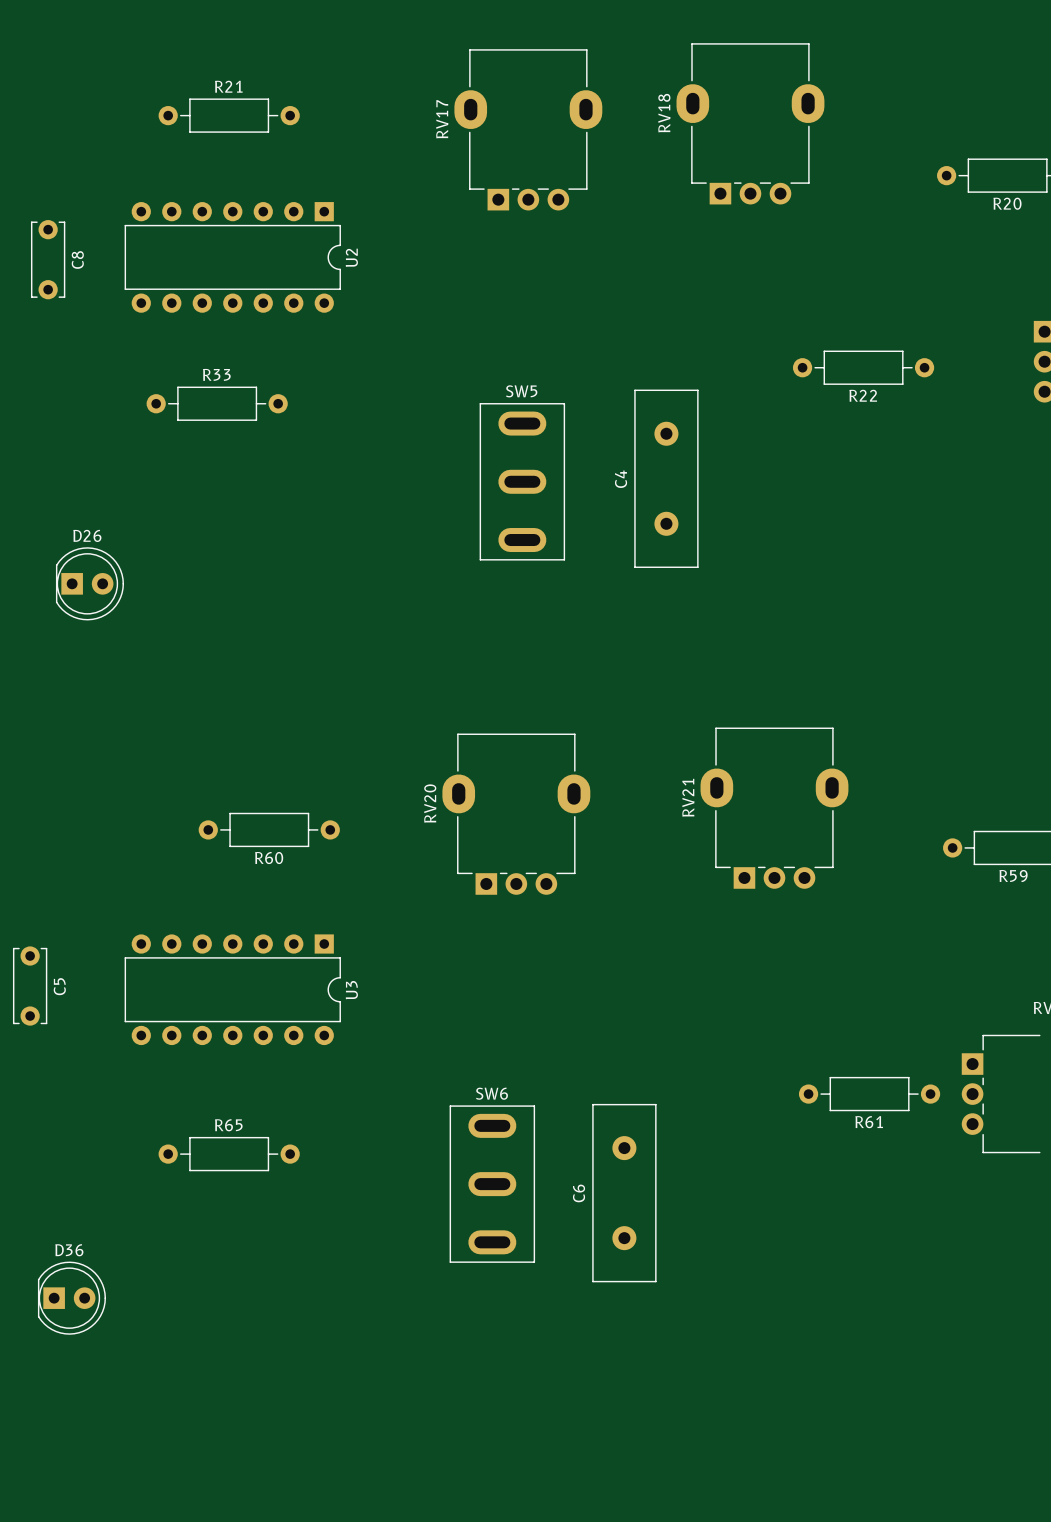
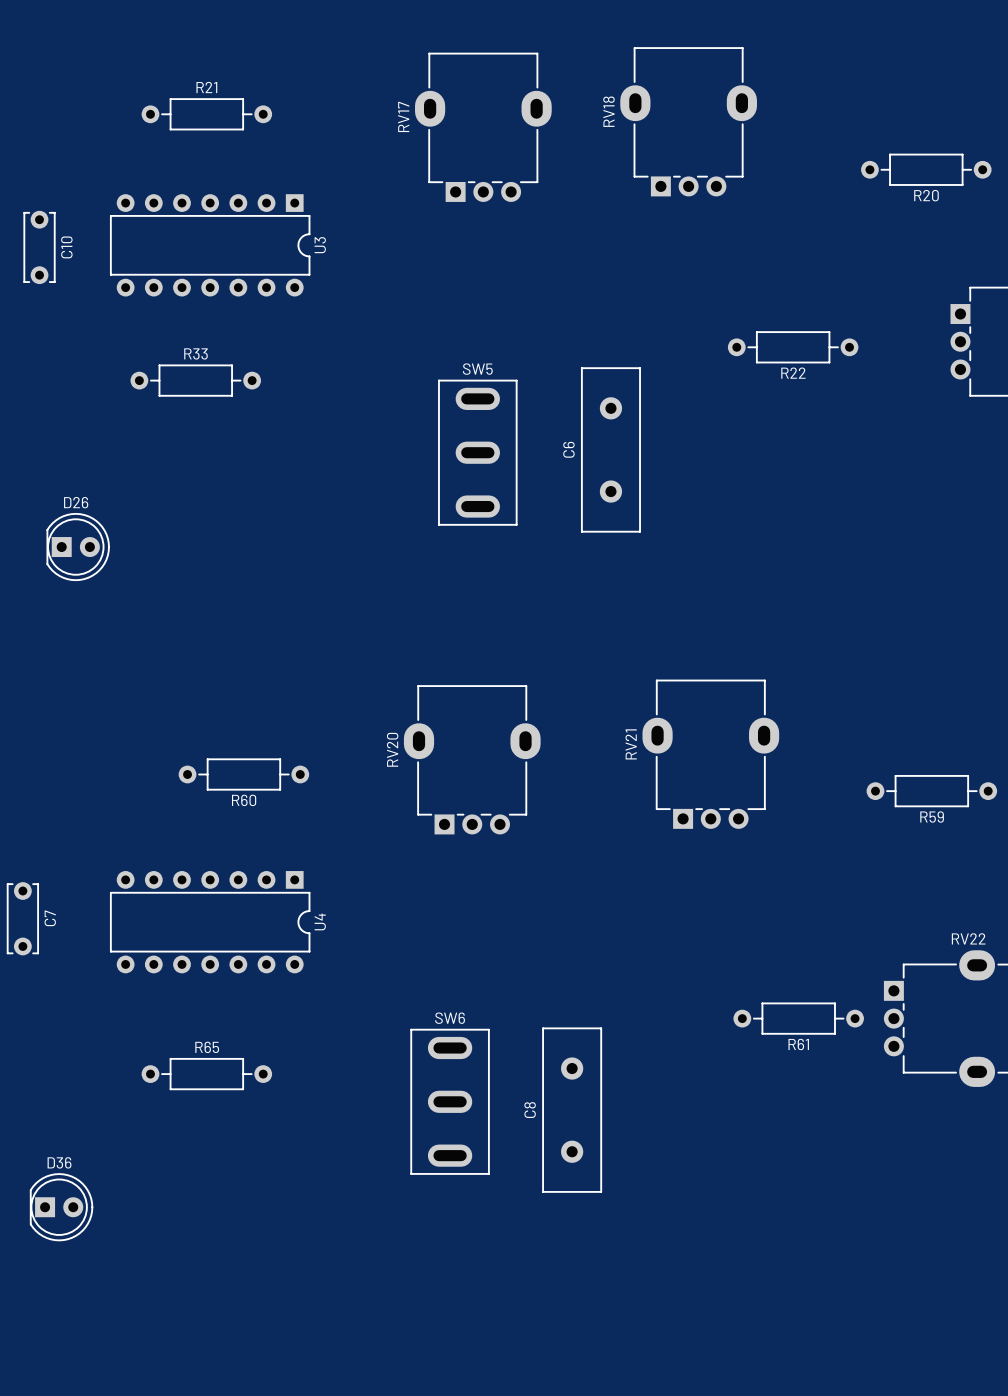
U2 name: U2 (351, 257) -> U3 (320, 245)
C8 name: C8 (77, 259) -> C10 (66, 247)
C4 name: C4 (621, 479) -> C6 (568, 449)
C5 name: C5 (59, 986) -> C7 (50, 918)
U3 name: U3 (351, 990) -> U4 (320, 921)
C6 name: C6 (579, 1193) -> C8 (530, 1110)

